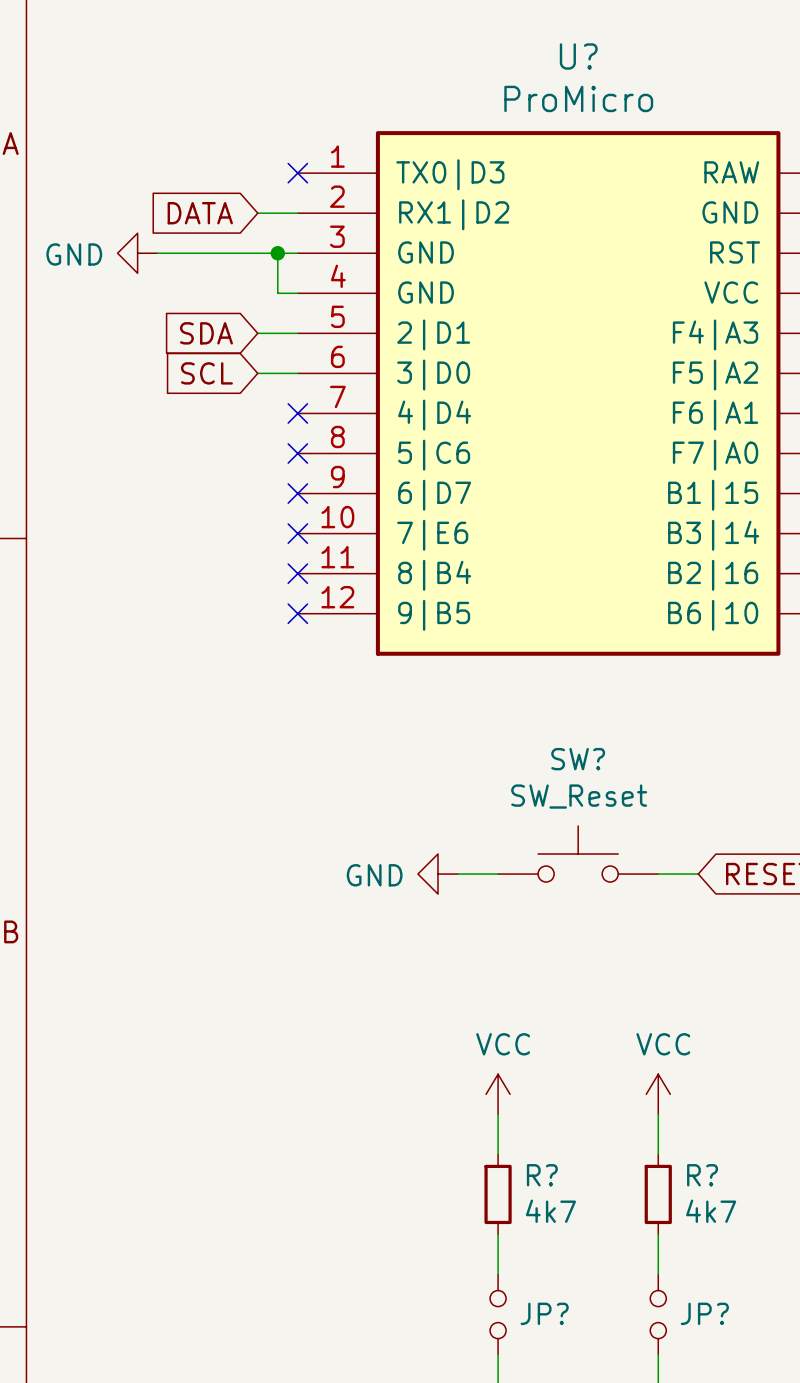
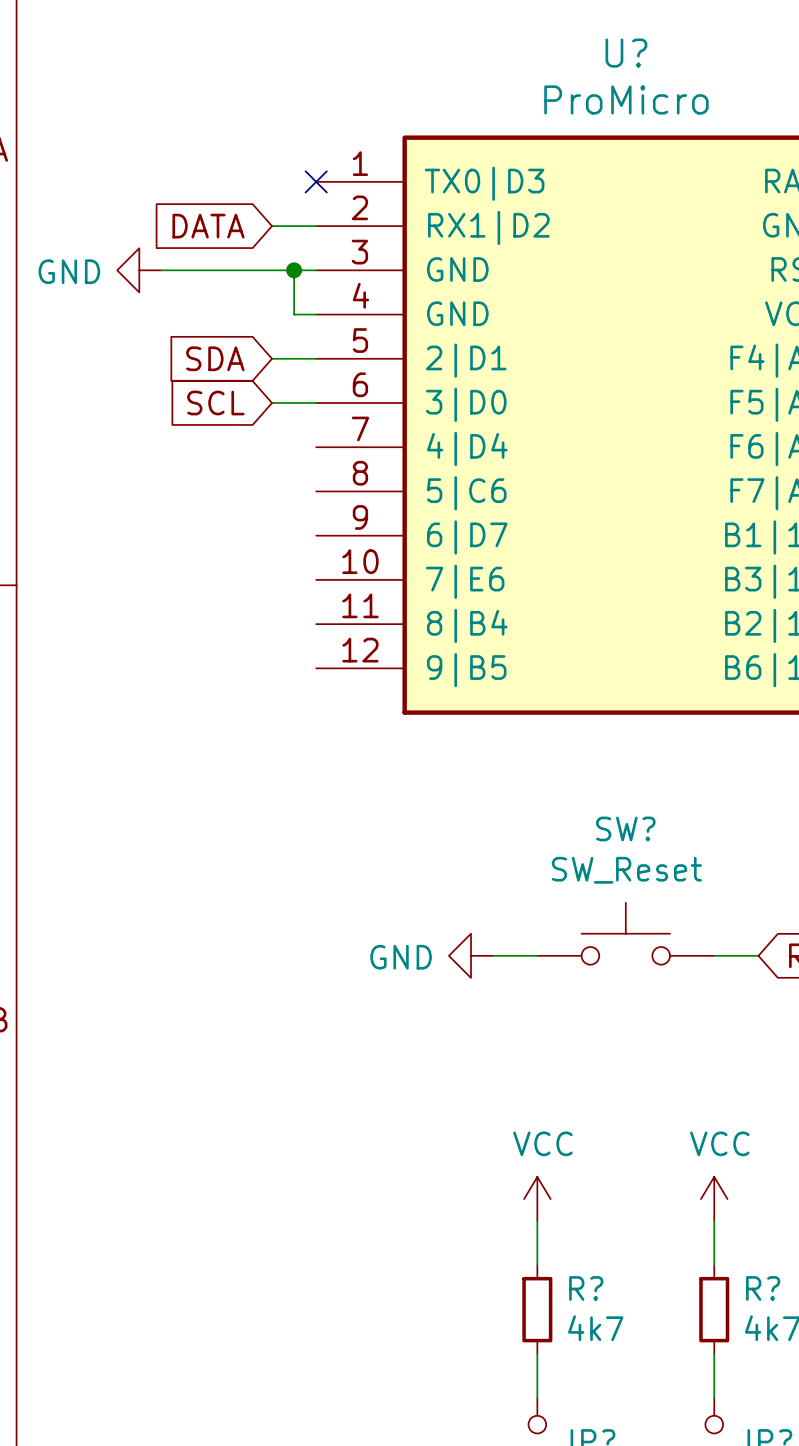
no-connect mark: (297, 413) -> none
no-connect mark: (297, 453) -> none
no-connect mark: (297, 493) -> none
no-connect mark: (297, 533) -> none
no-connect mark: (297, 573) -> none
no-connect mark: (297, 613) -> none

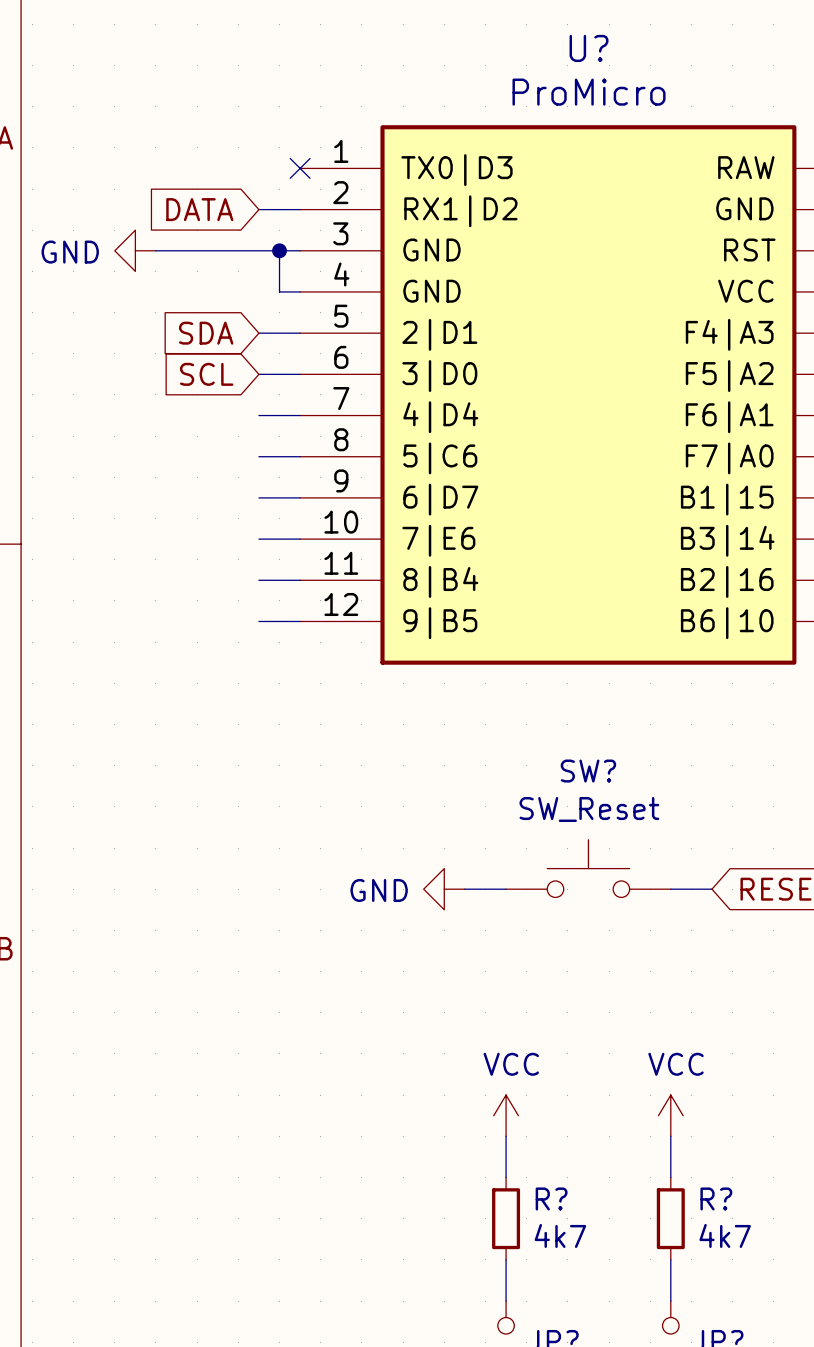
wire: none -> (258, 415) (300, 415)
wire: none -> (258, 456) (300, 456)
wire: none -> (258, 497) (300, 497)
wire: none -> (258, 539) (300, 539)
wire: none -> (258, 580) (300, 580)
wire: none -> (258, 621) (300, 621)

